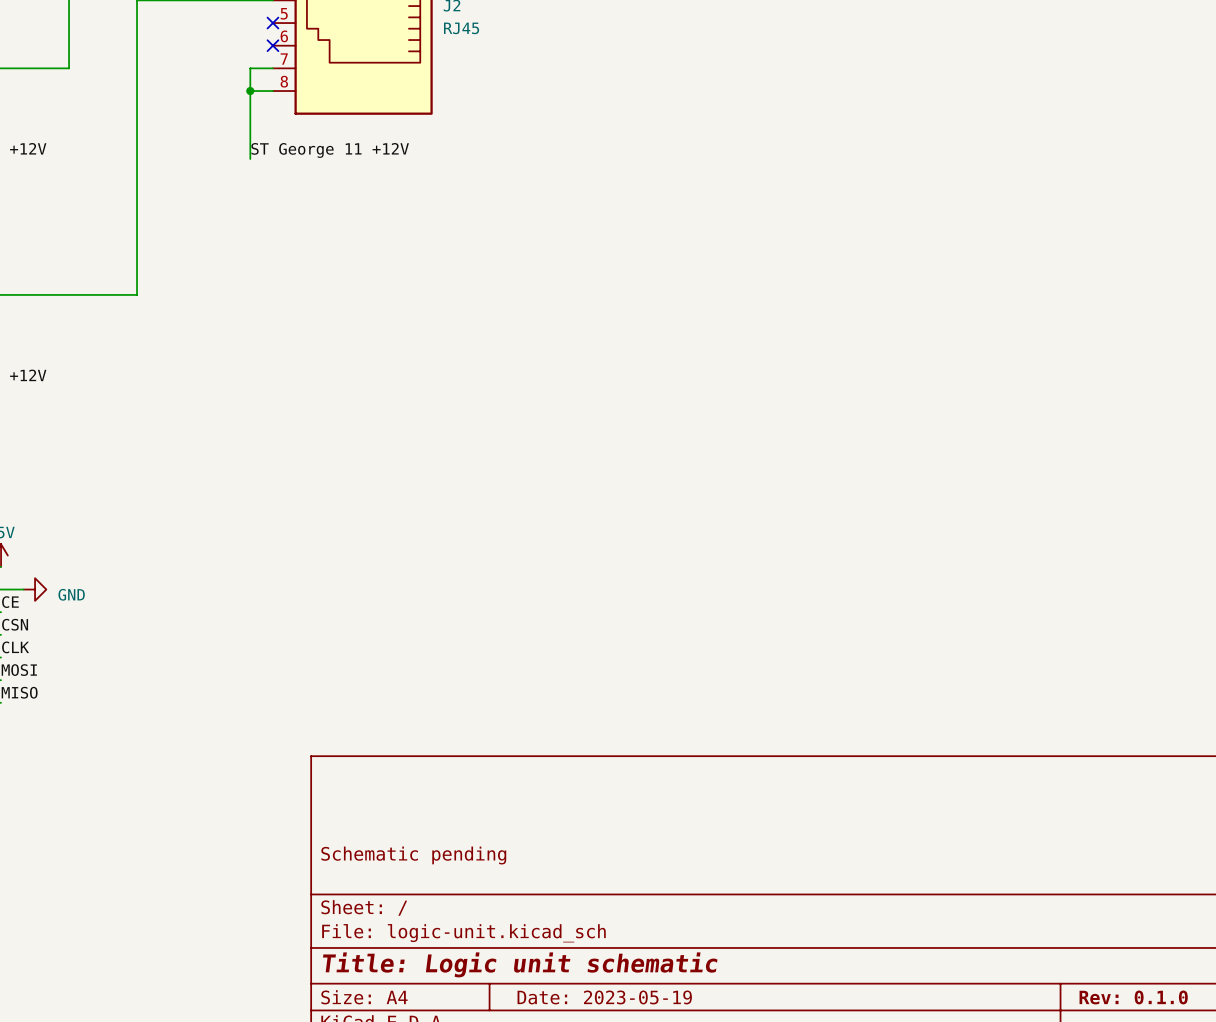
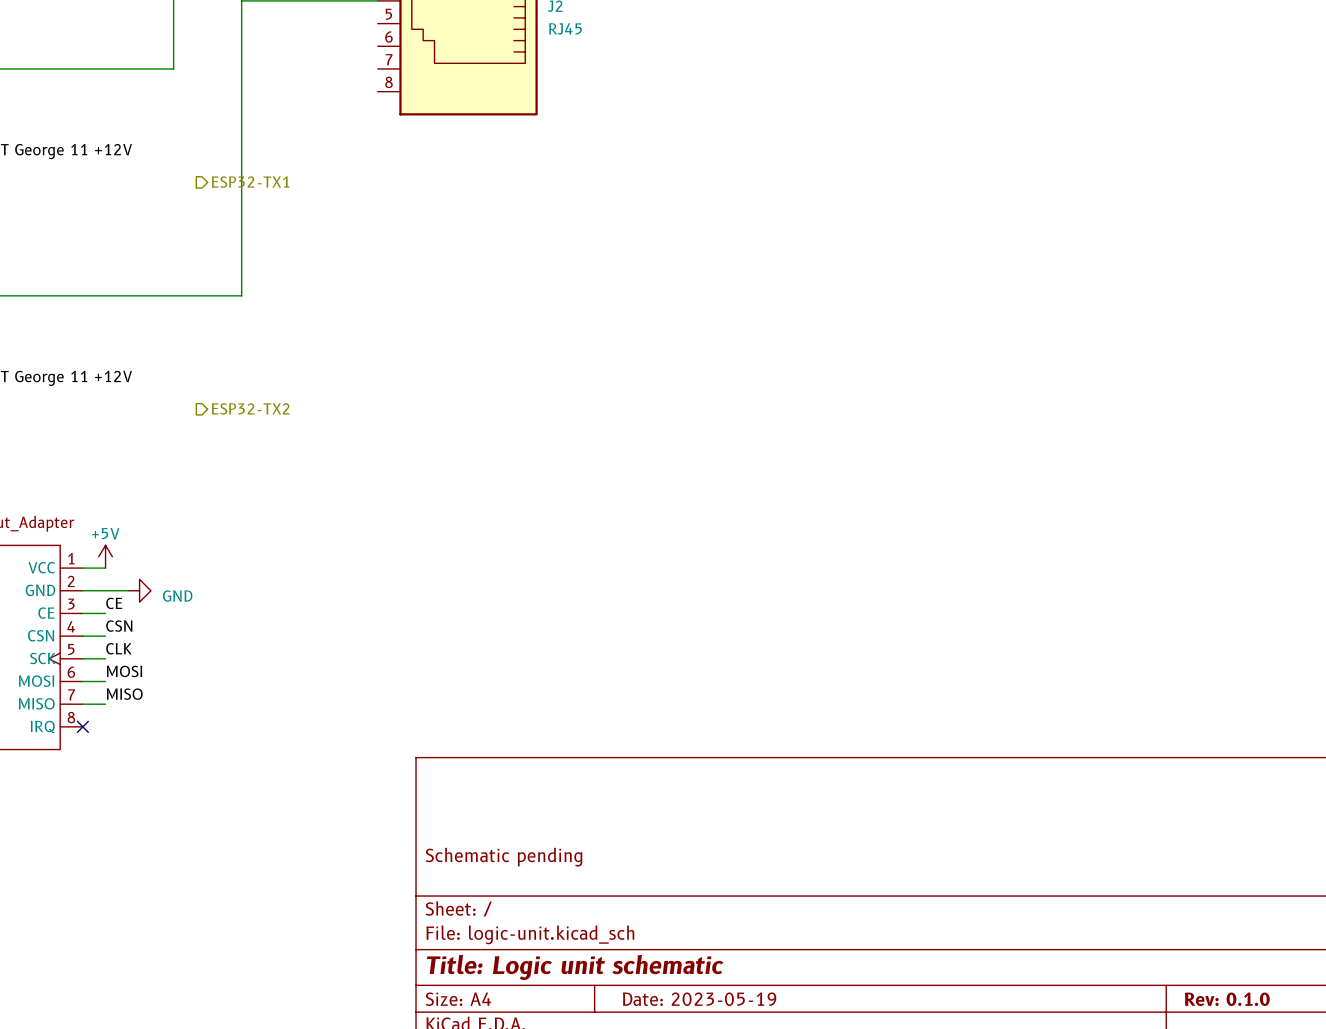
no-connect mark: (272, 23) -> none
no-connect mark: (272, 45) -> none
wire: (272, 68) (250, 68) (250, 158) -> none
wire: (250, 91) (272, 91) -> none
junction: (250, 91) -> none
label: ST George 11 +12V (330, 150) -> none
hierarchical label: none -> ESP32-TX1 (250, 182)
hierarchical label: none -> ESP32-TX2 (250, 408)

